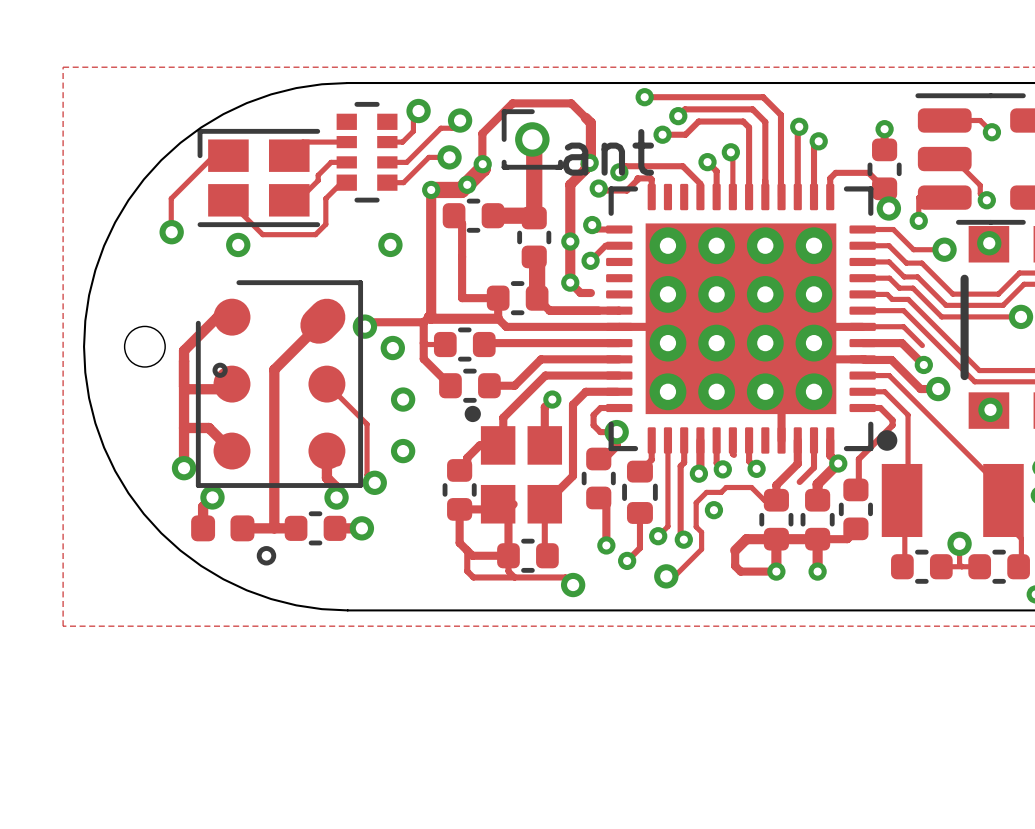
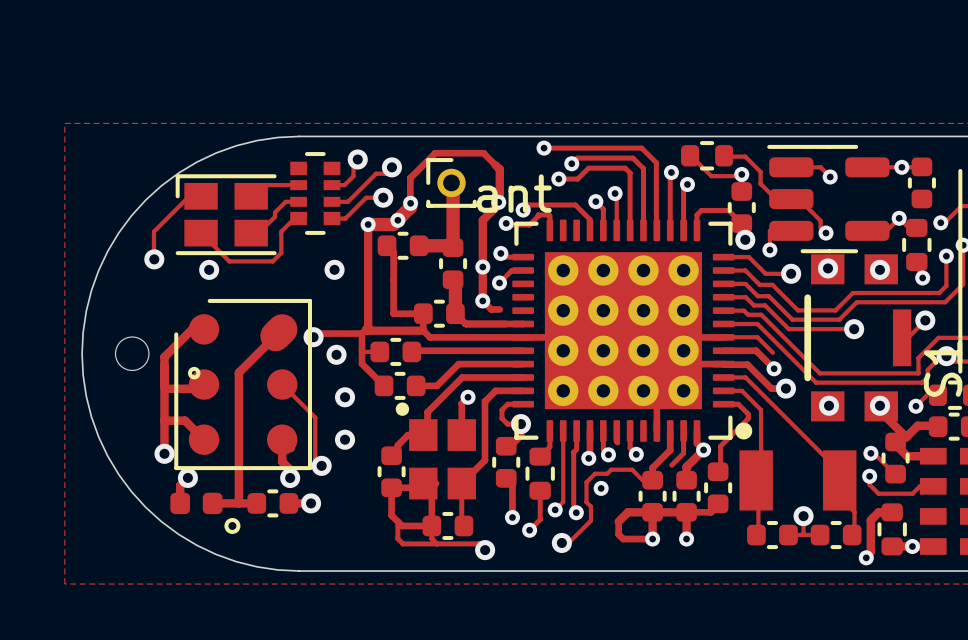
part: none -> (707, 155)
track: none -> (692, 156) (711, 176) (740, 176) (741, 174)
track: none -> (726, 156) (745, 156) (760, 171) (760, 183) (775, 199) (791, 199)

